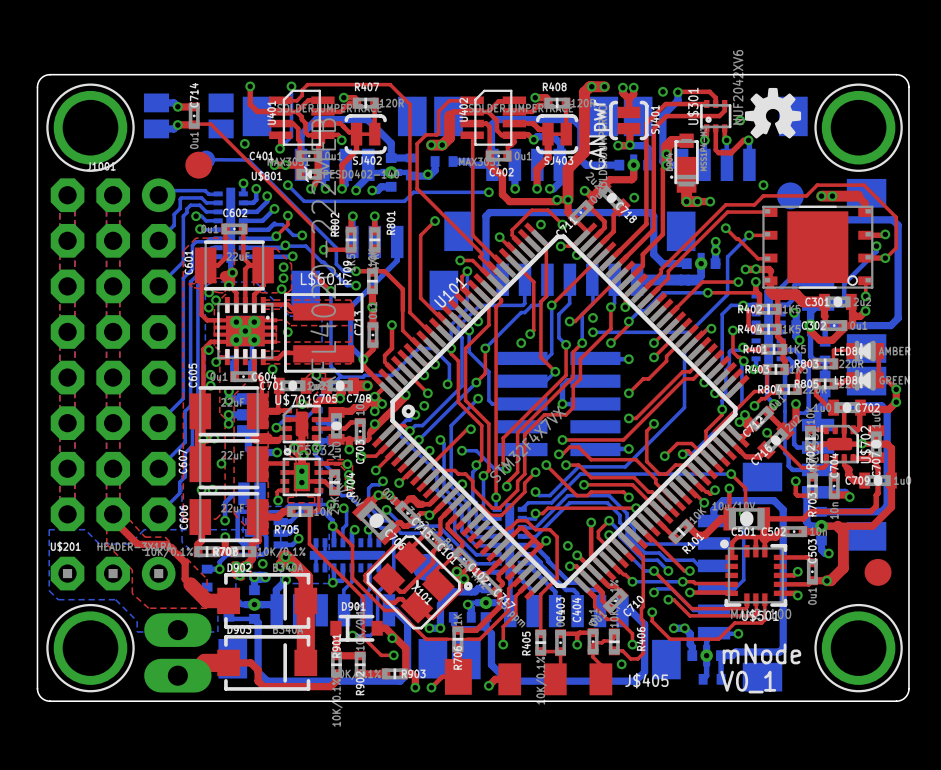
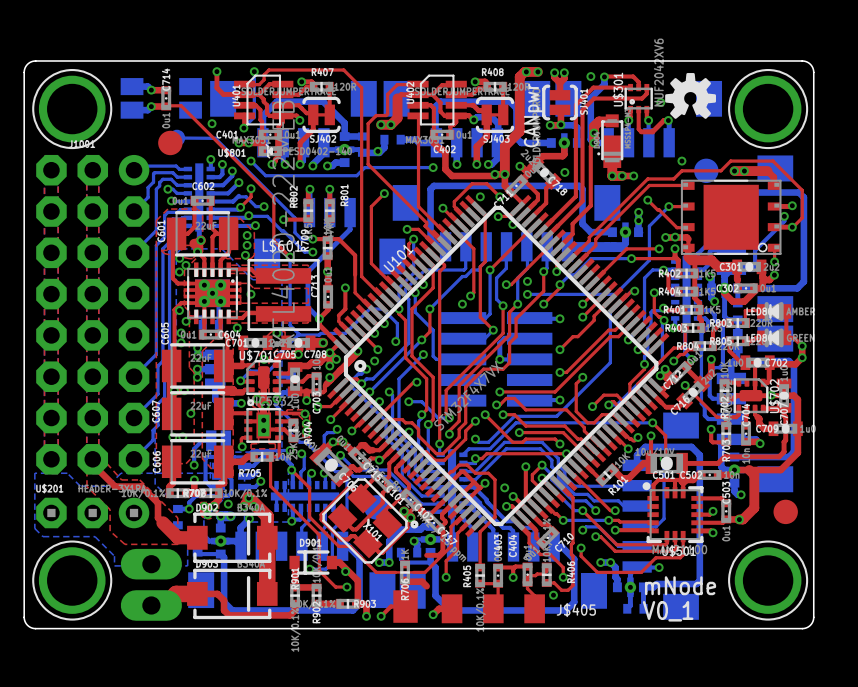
top track: (499, 606) (476, 630) (457, 630) -> (442, 543) (442, 551) (438, 555) (426, 555)
top track: none -> (405, 581) (422, 581) (426, 586)

